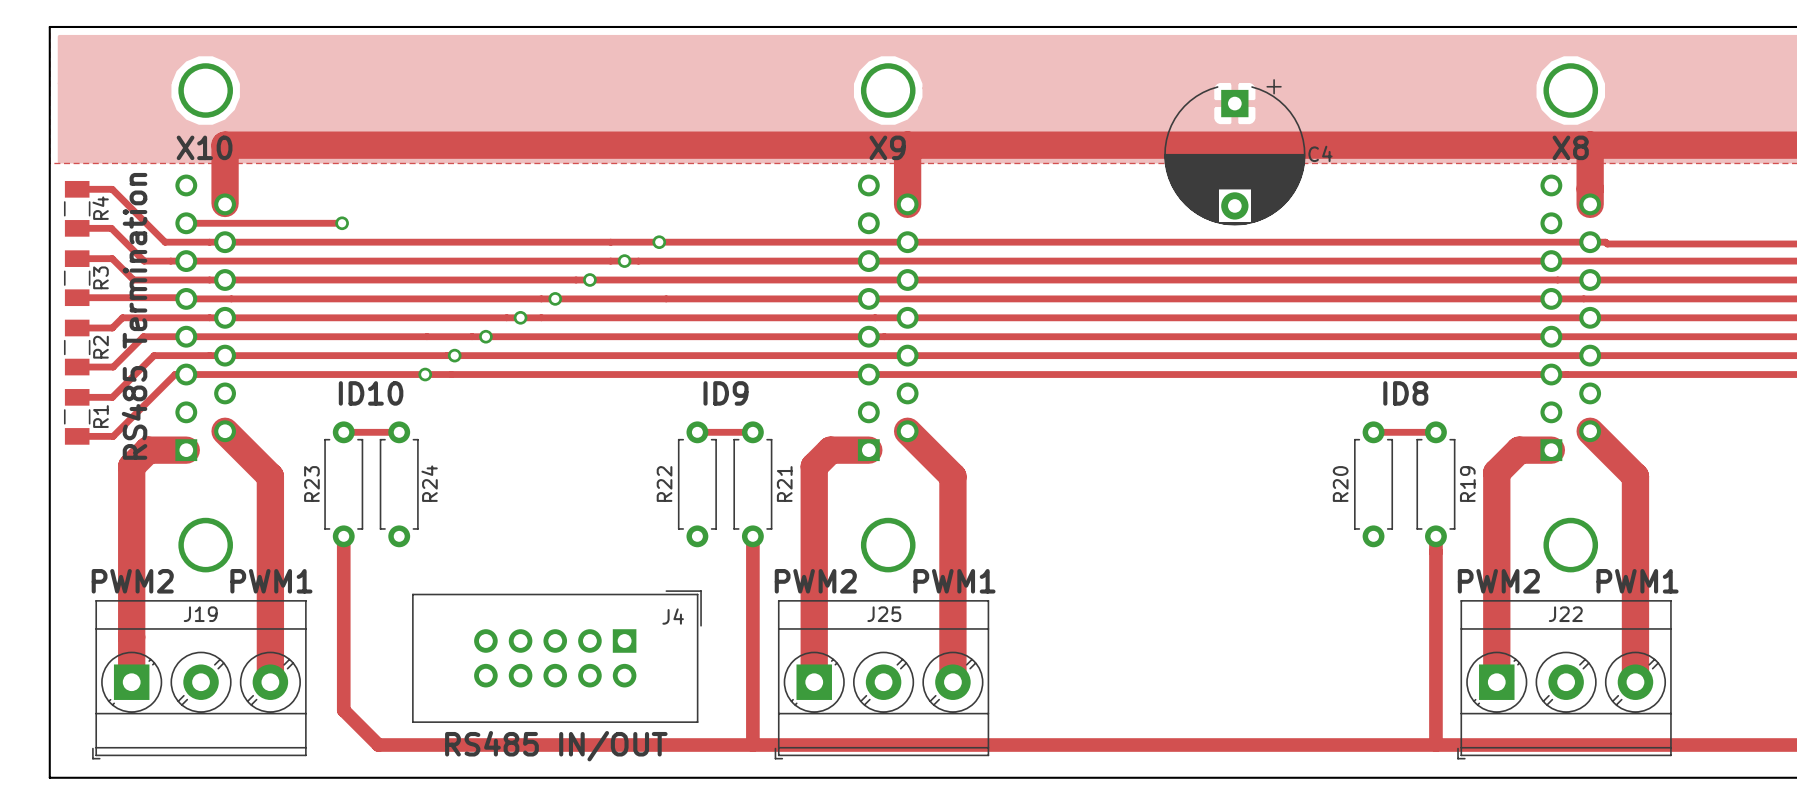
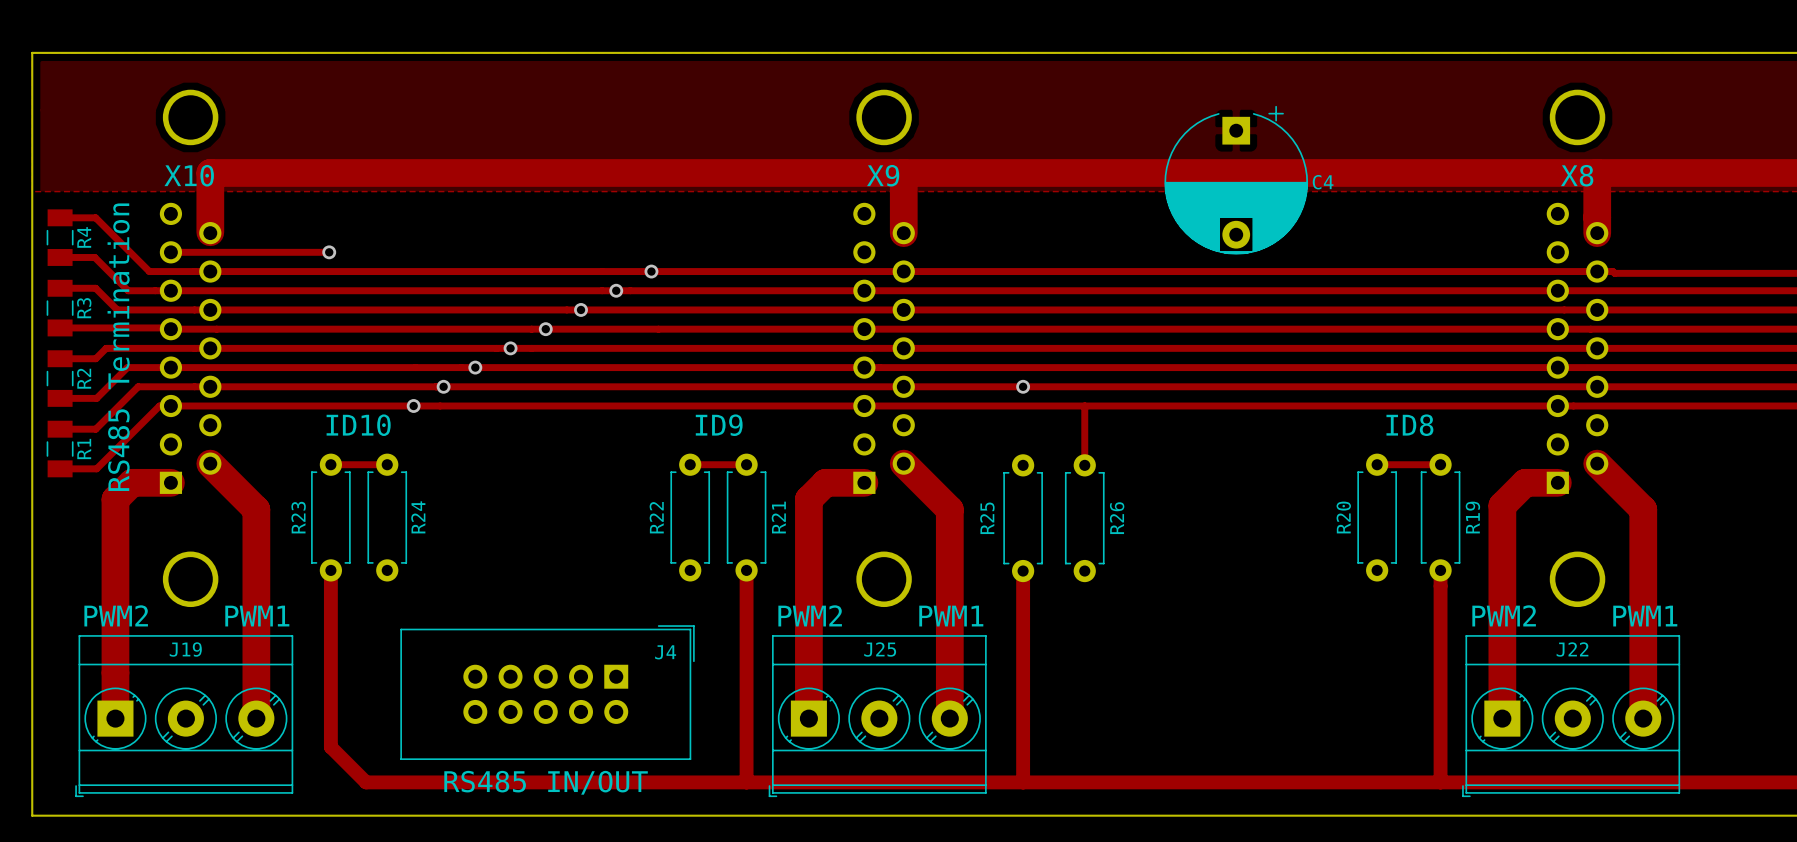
via: none -> (1023, 386)
track: none -> (1084, 406) (1084, 465)
R25: none -> (1023, 518)
R26: none -> (1084, 518)
track: none -> (1023, 571) (1023, 782)

